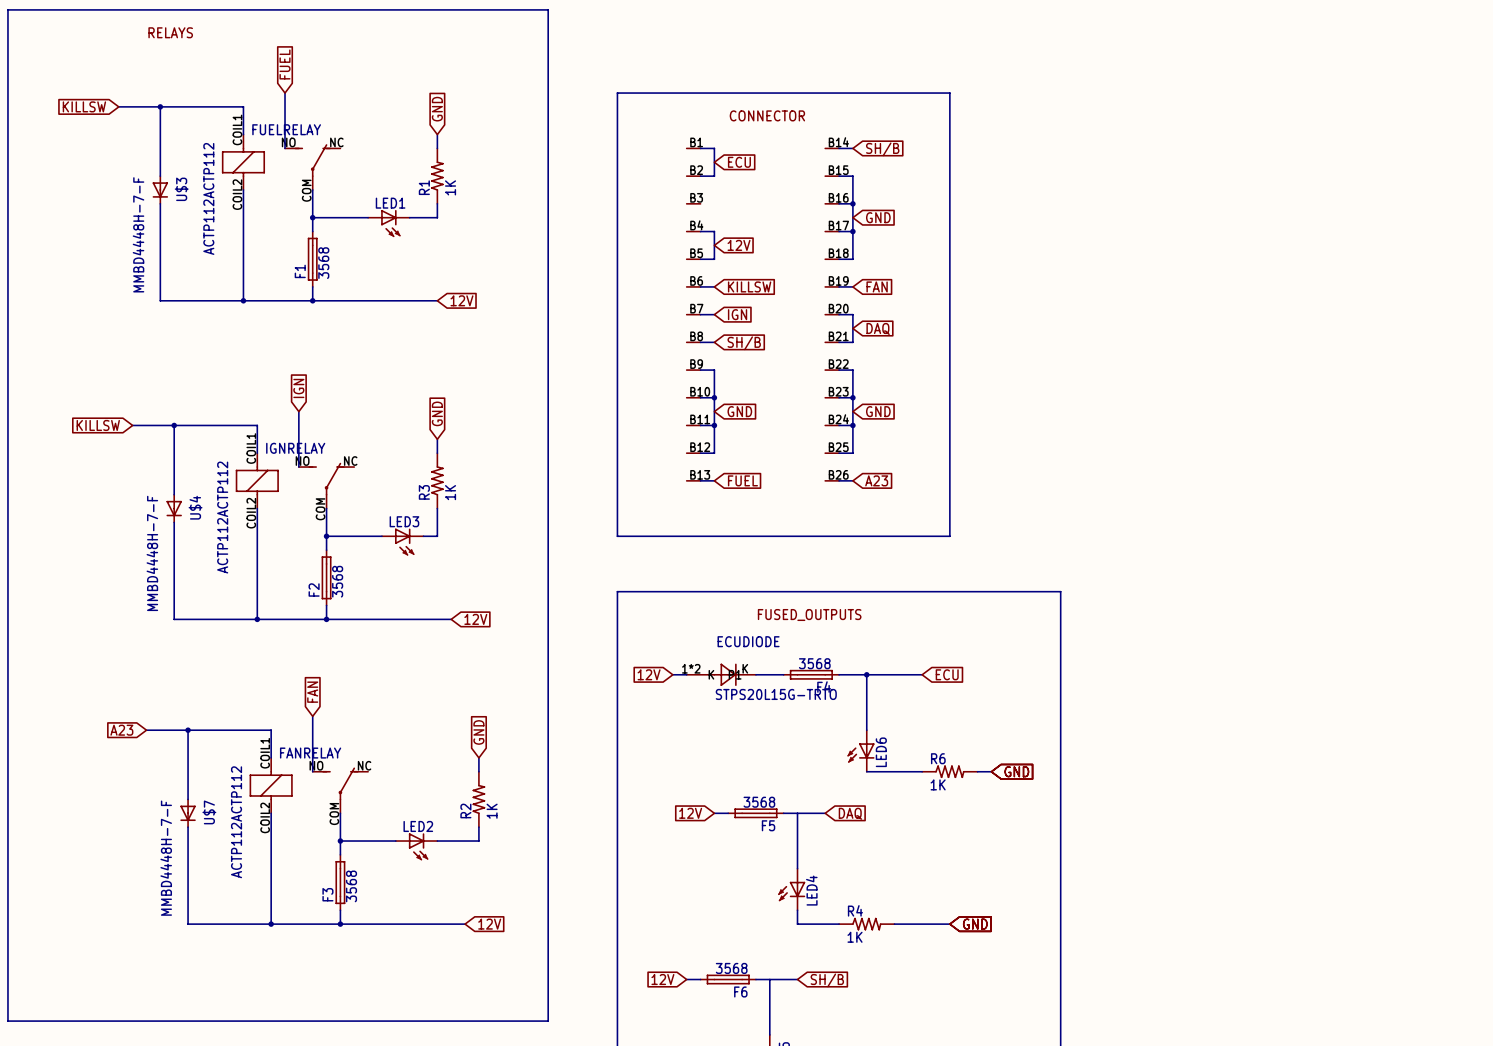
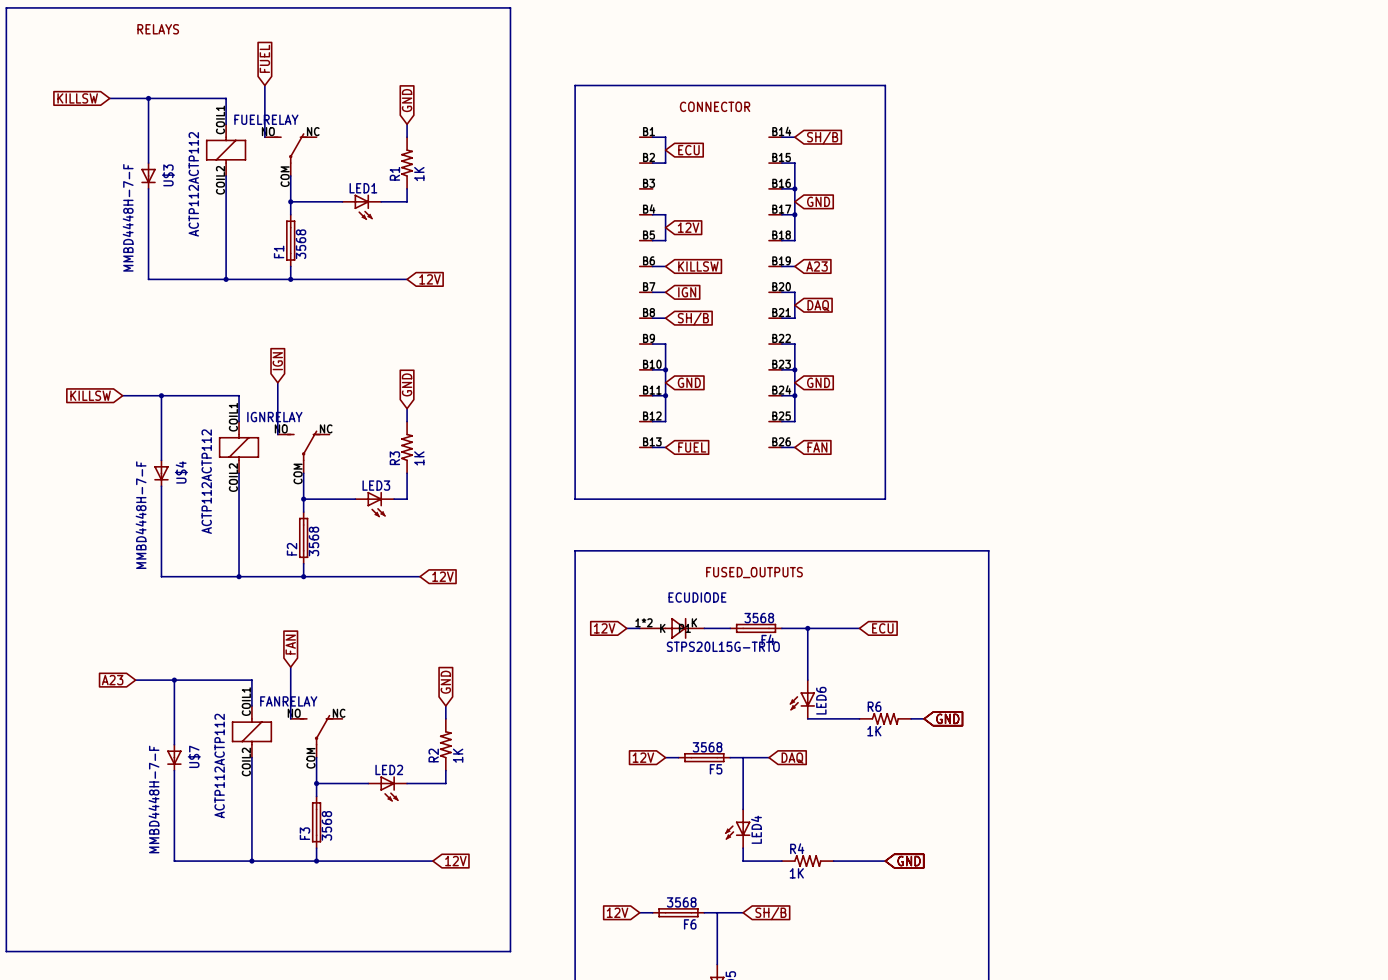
global label: FAN (877, 286) -> A23 (817, 266)
global label: A23 (876, 480) -> FAN (817, 447)

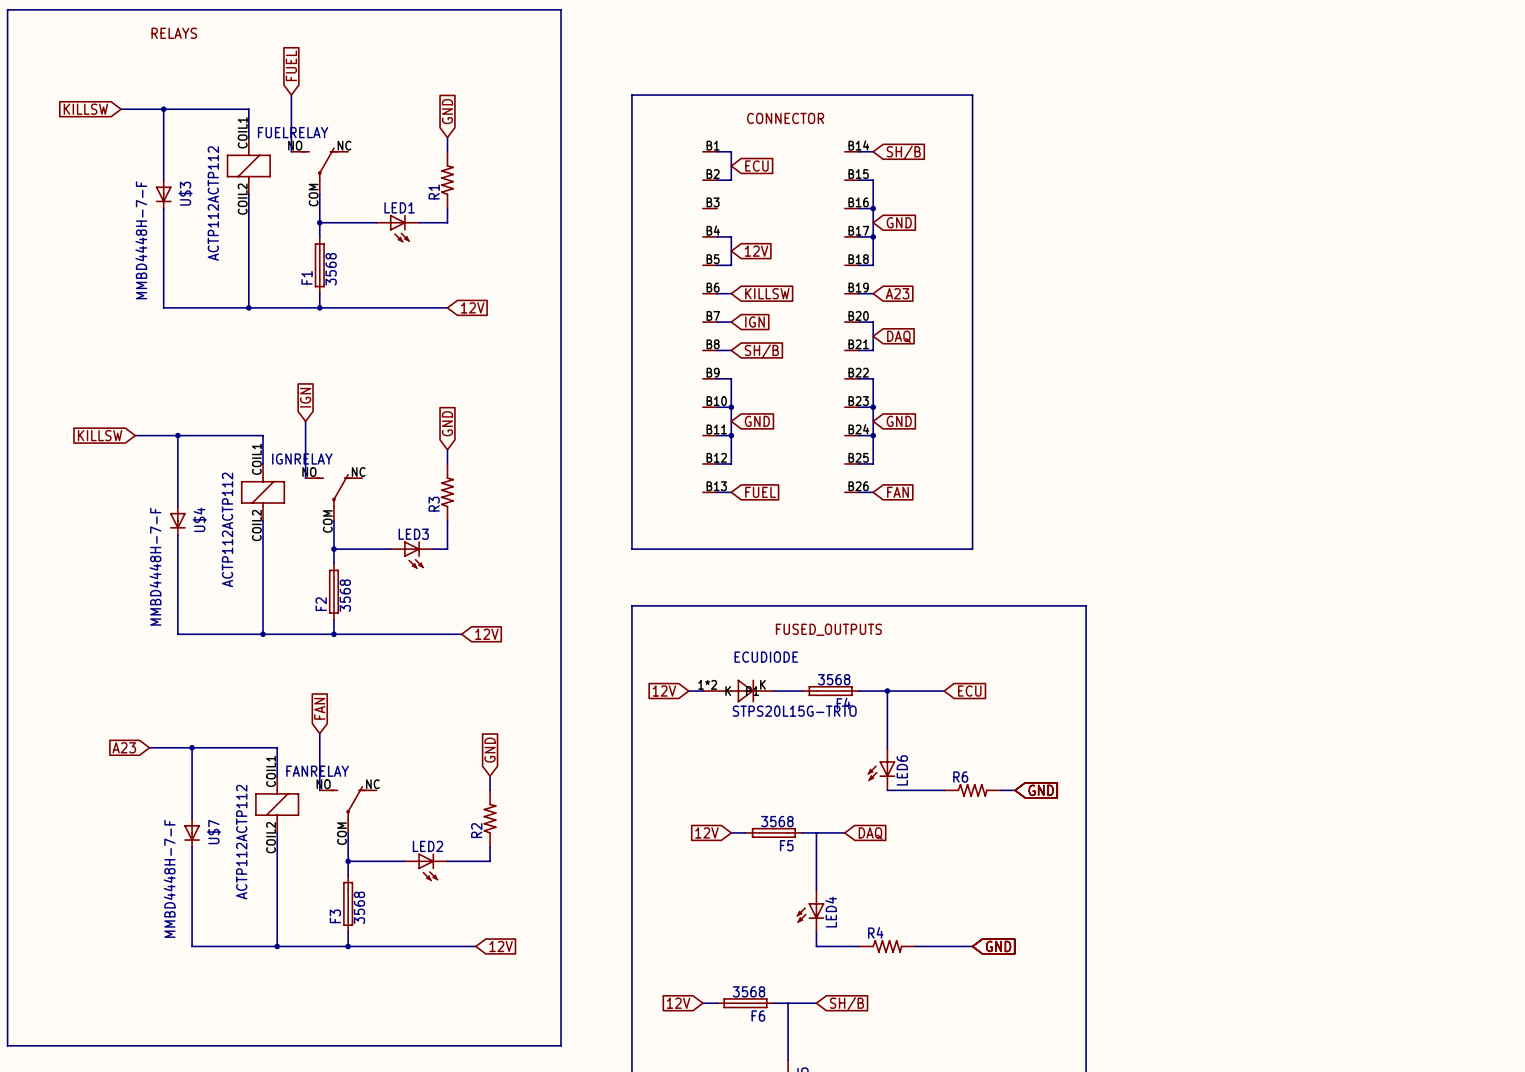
R1 value: 1K (419, 174) -> none
R3 value: 1K (419, 458) -> none
R6 value: 1K (874, 731) -> none
R2 value: 1K (458, 755) -> none
R4 value: 1K (796, 873) -> none

